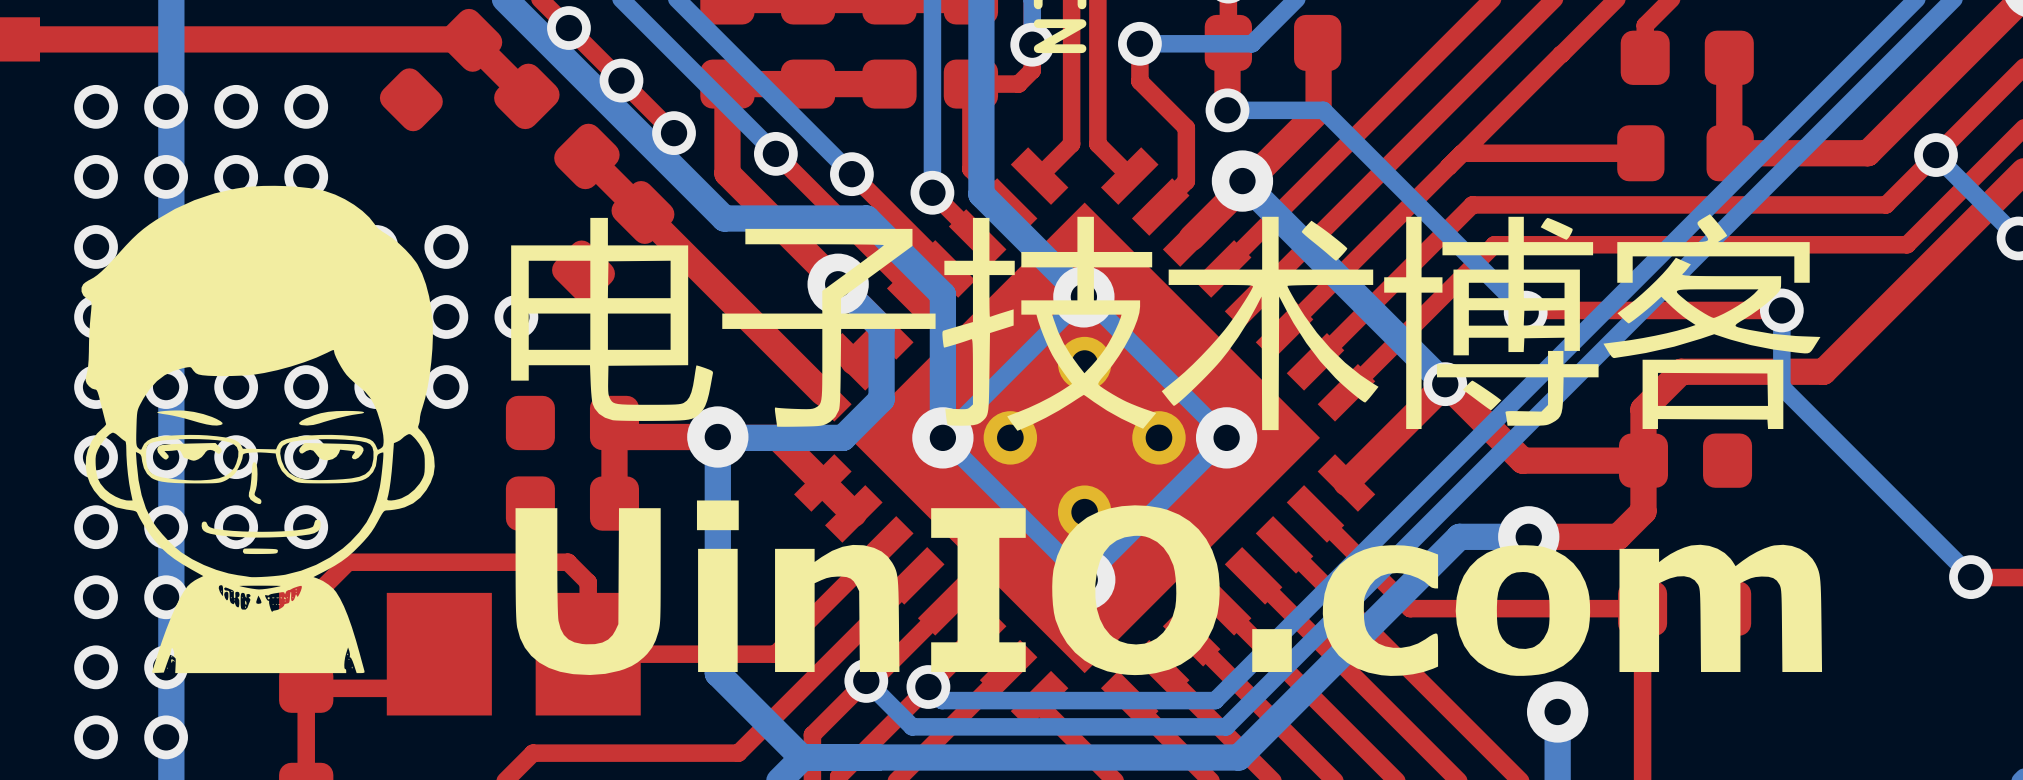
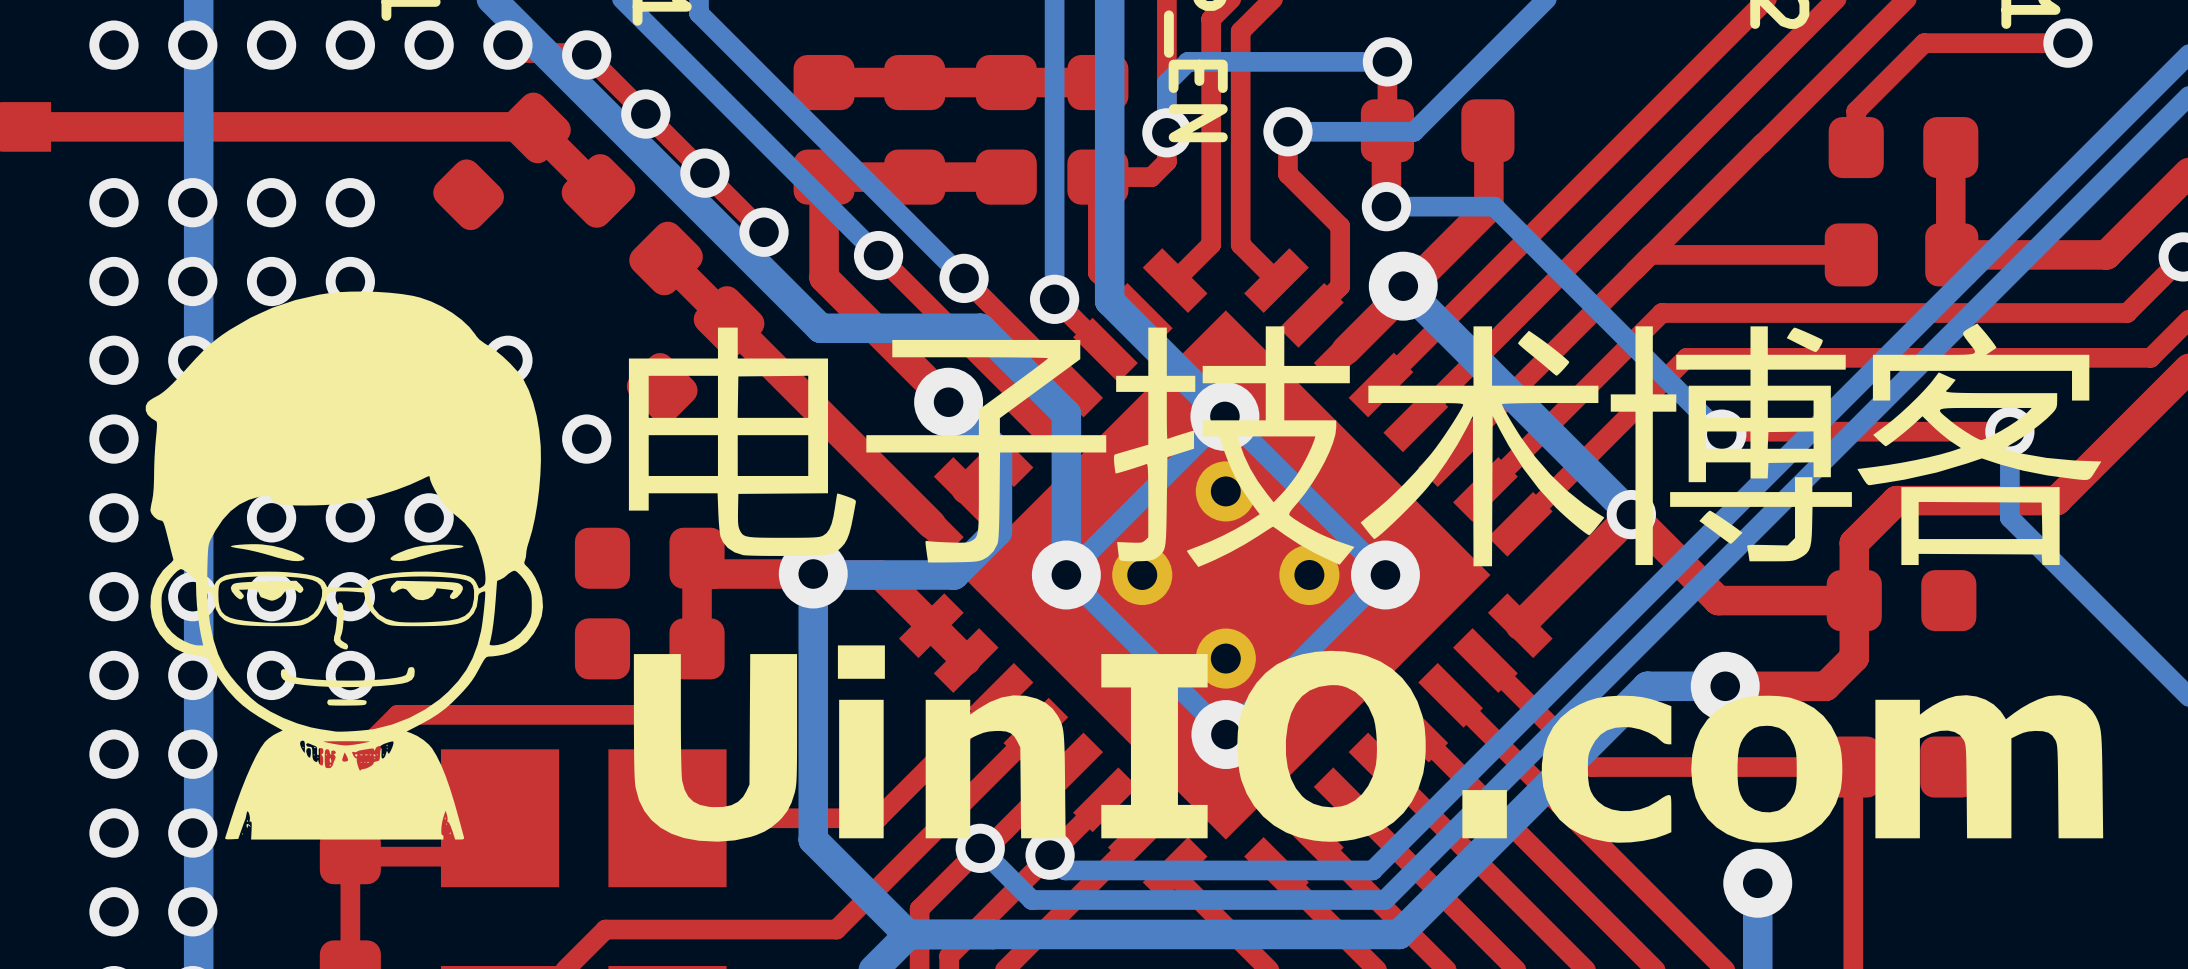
drawing position: (951, 430) -> (1124, 567)

